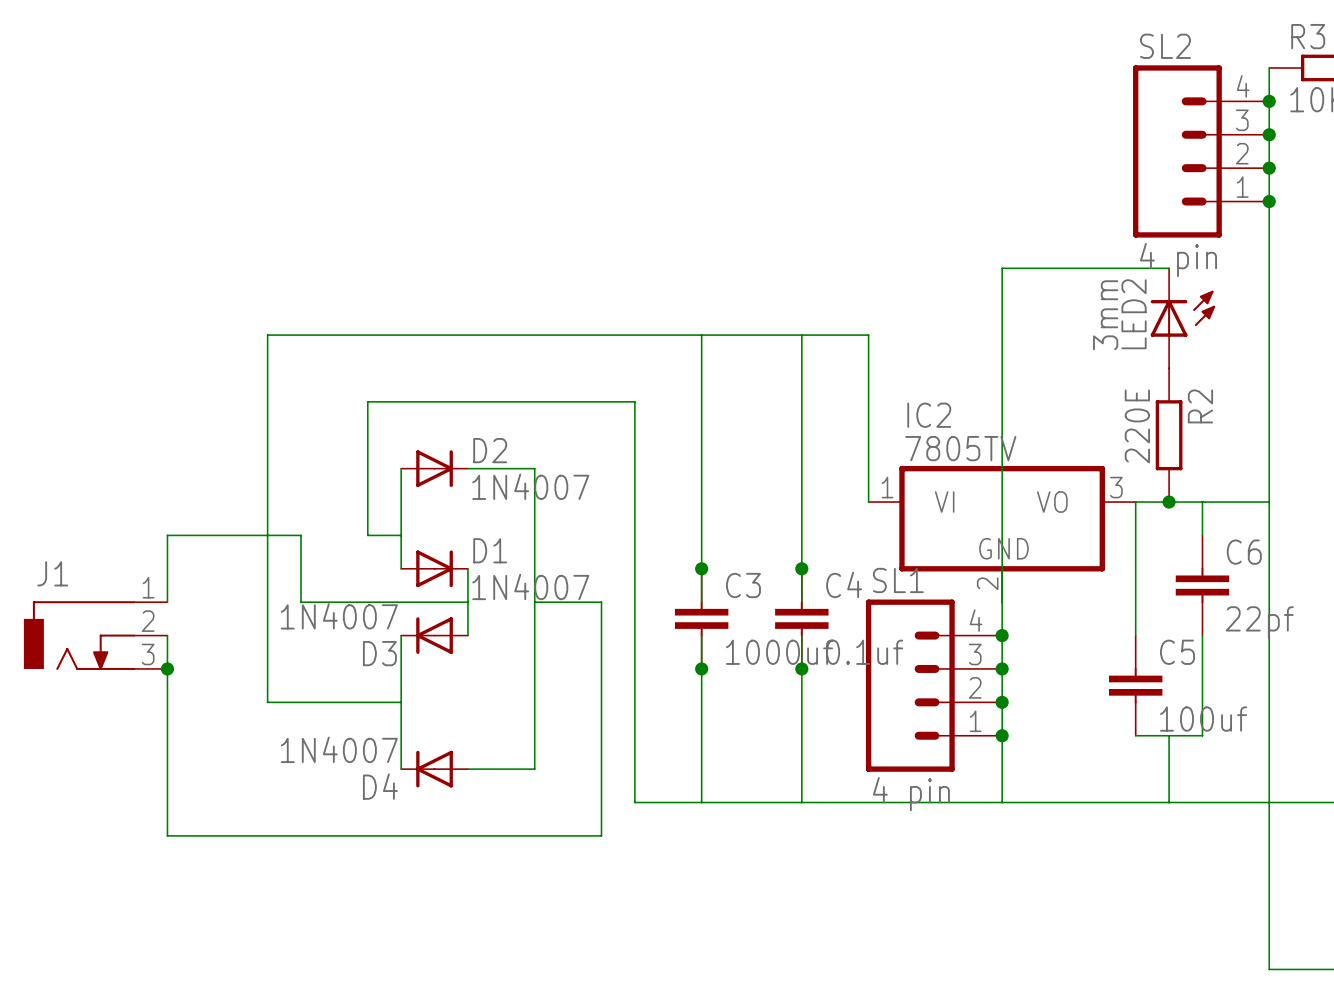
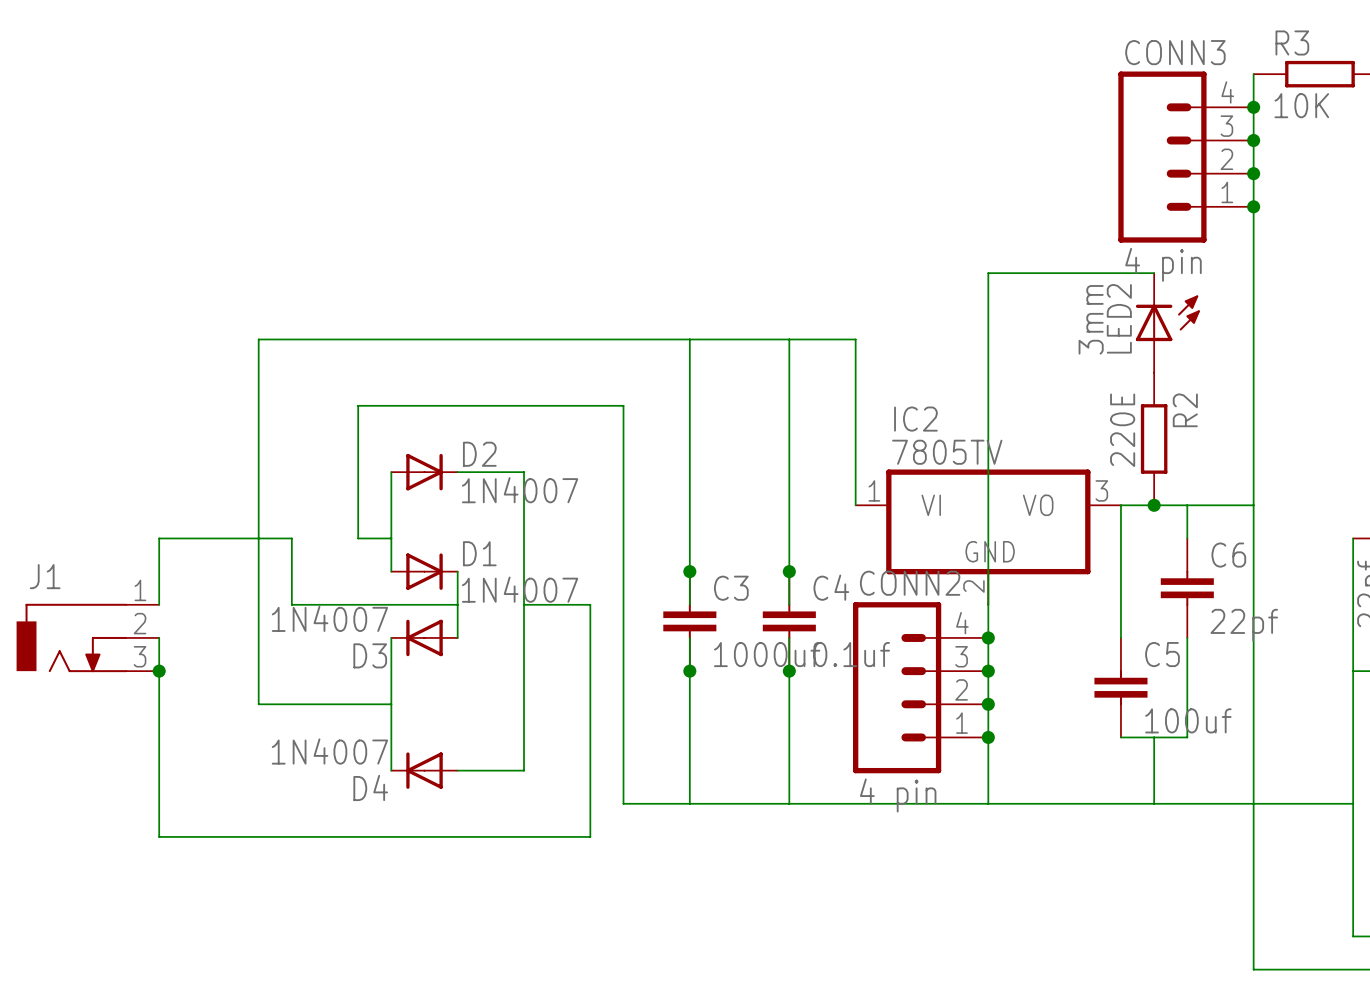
SL2 name: SL2 (1165, 46) -> CONN3 (1175, 52)
SL1 name: SL1 (898, 580) -> CONN2 (910, 583)

